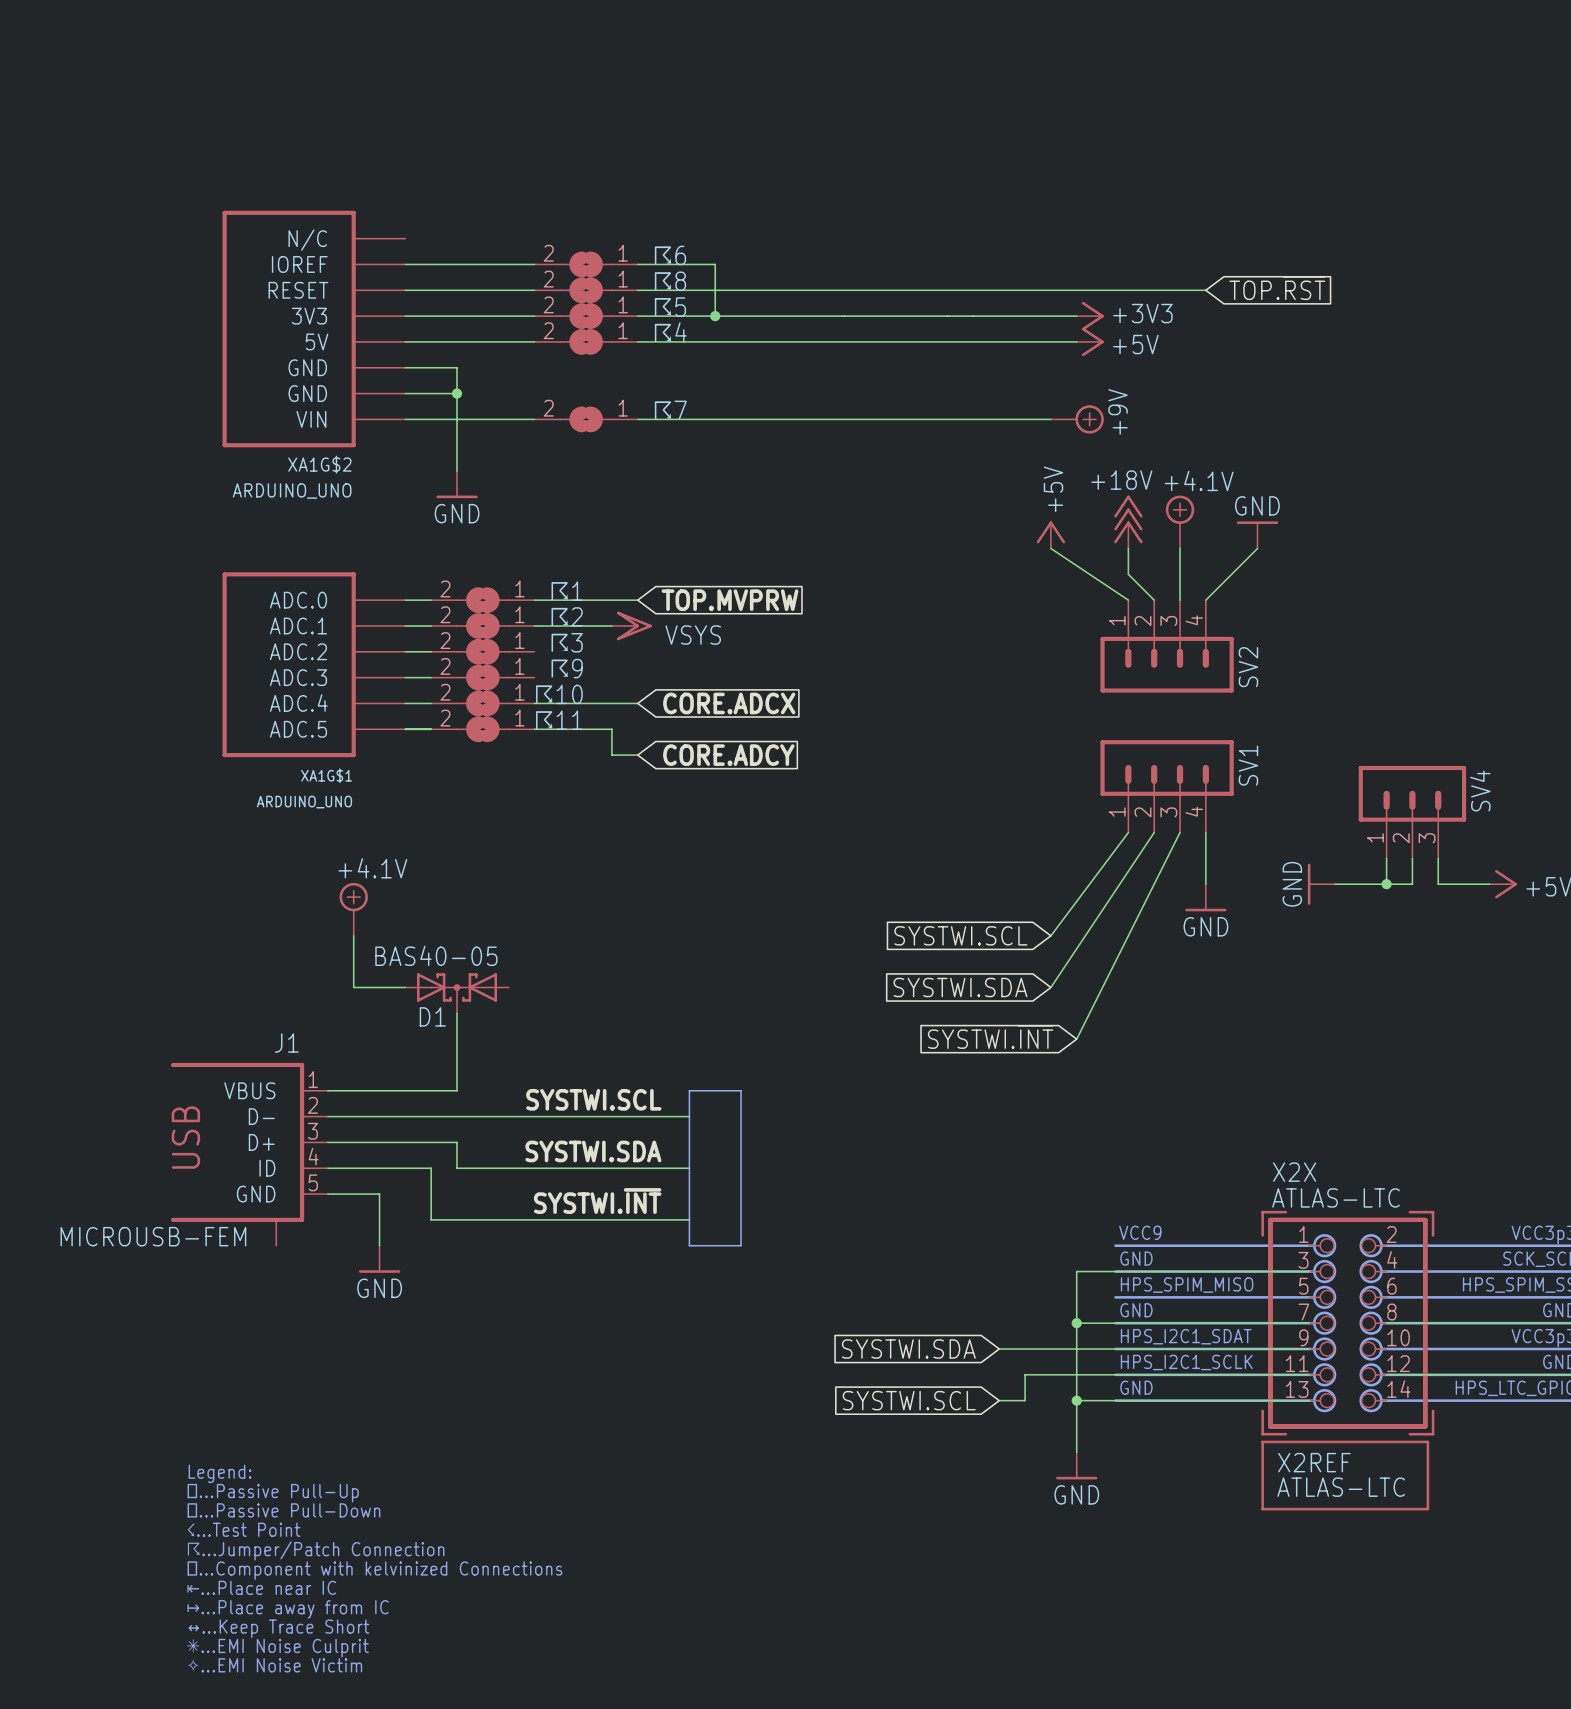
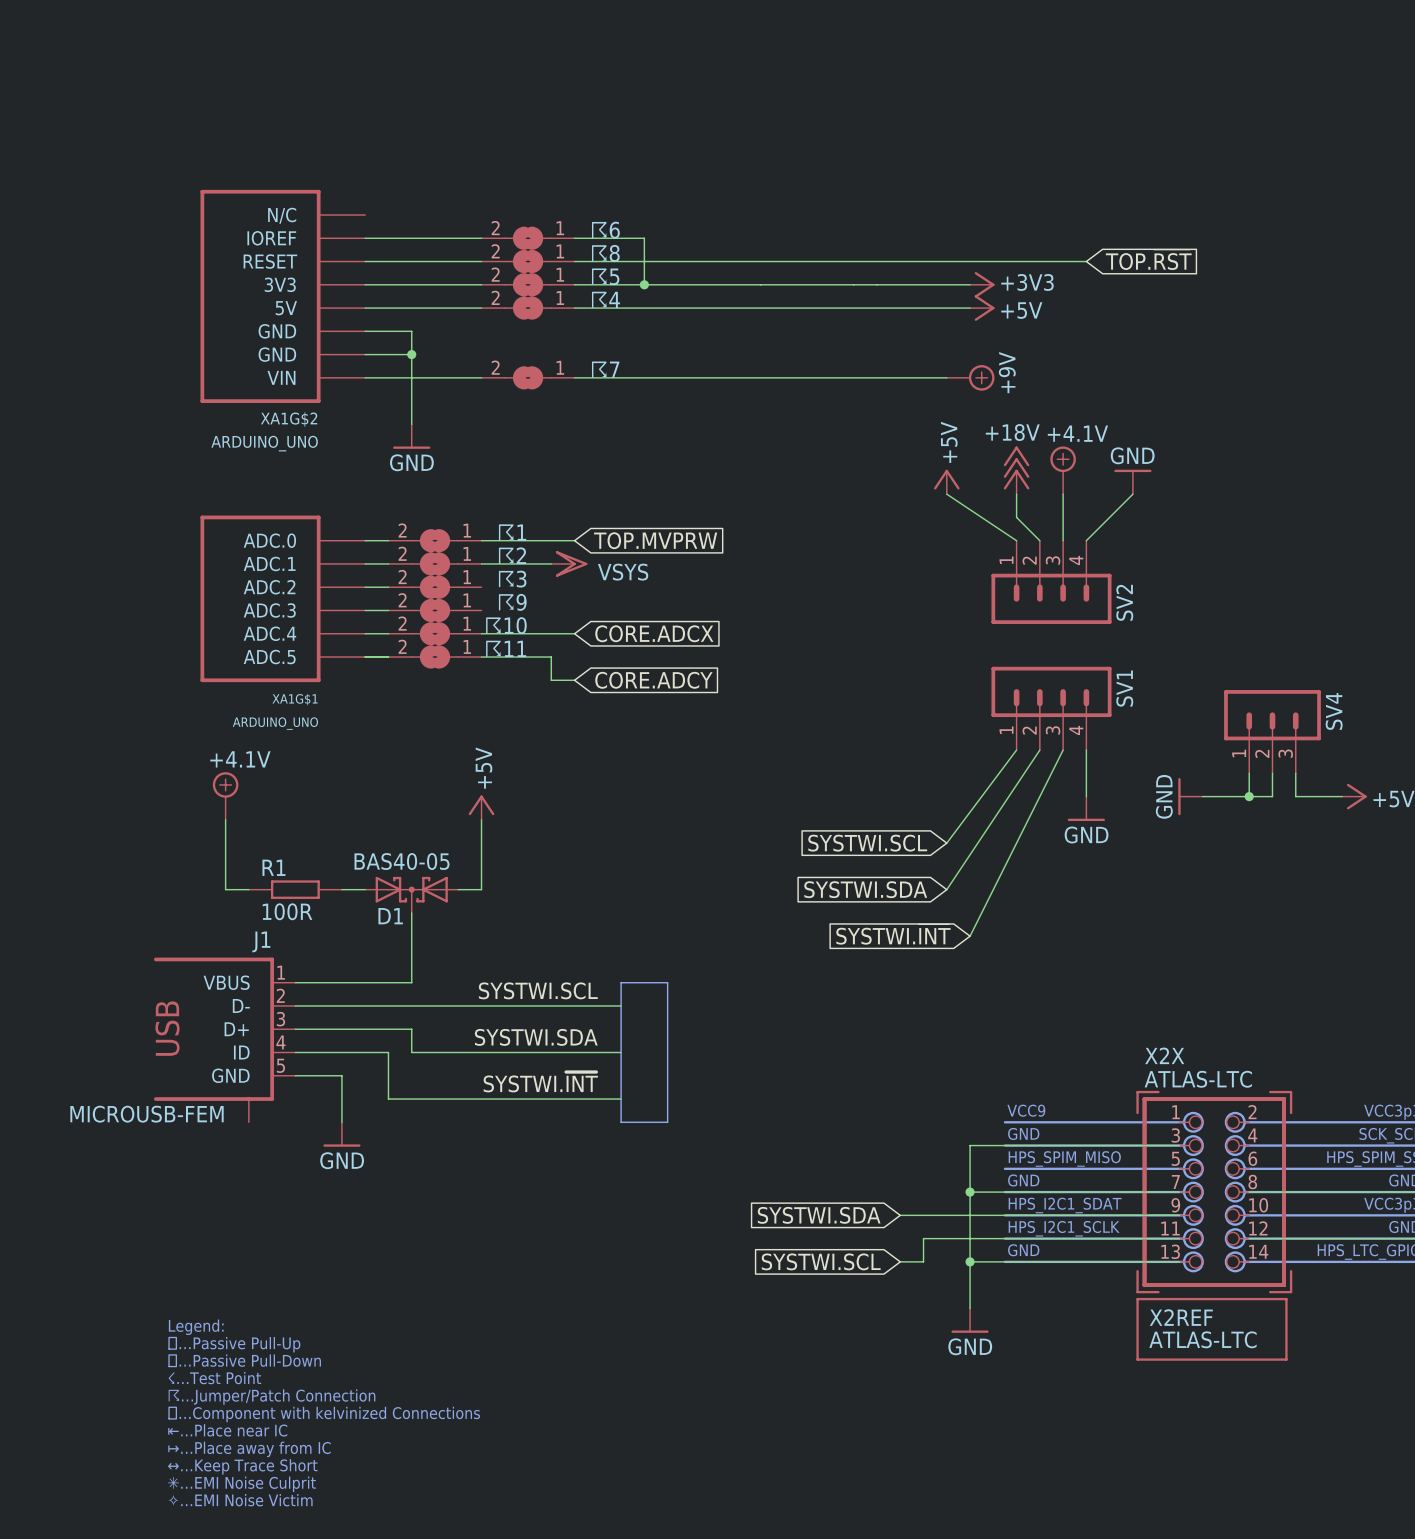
power symbol: none -> +5V (481, 807)
power symbol position: +4.1V (353, 909) -> +4.1V (225, 796)
wire: none -> (225, 819) (225, 889) (248, 889)
wire: none -> (481, 819) (481, 889) (458, 889)
wire: (353, 935) (353, 987) (379, 987) -> none
R1: none -> 100R (295, 889)

